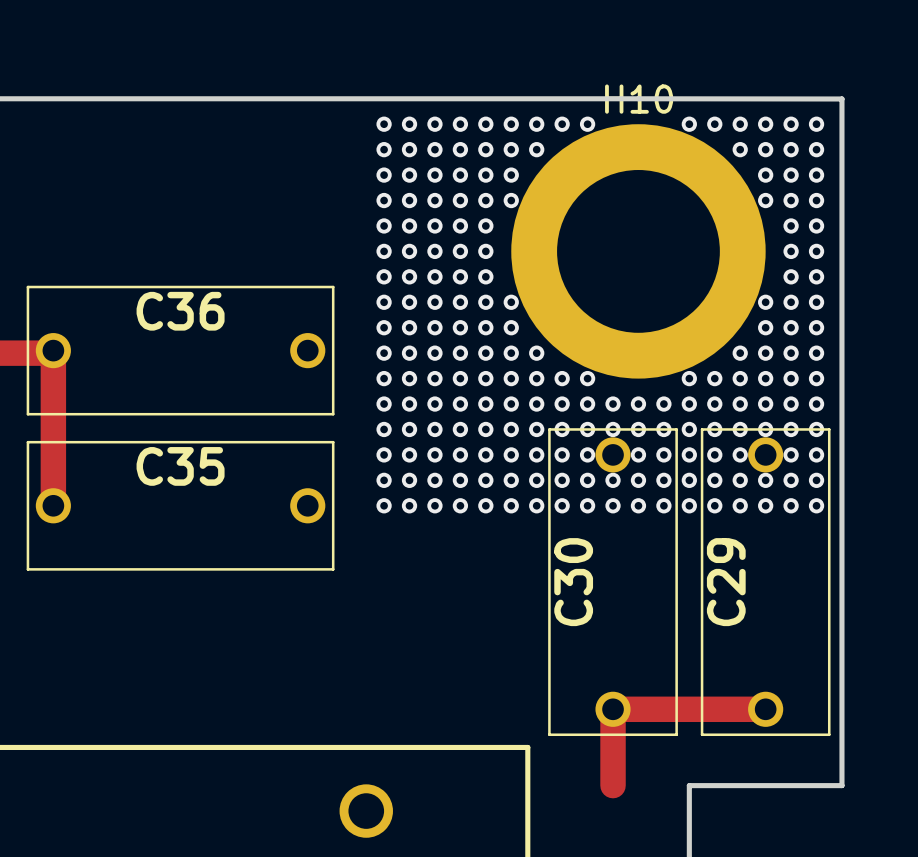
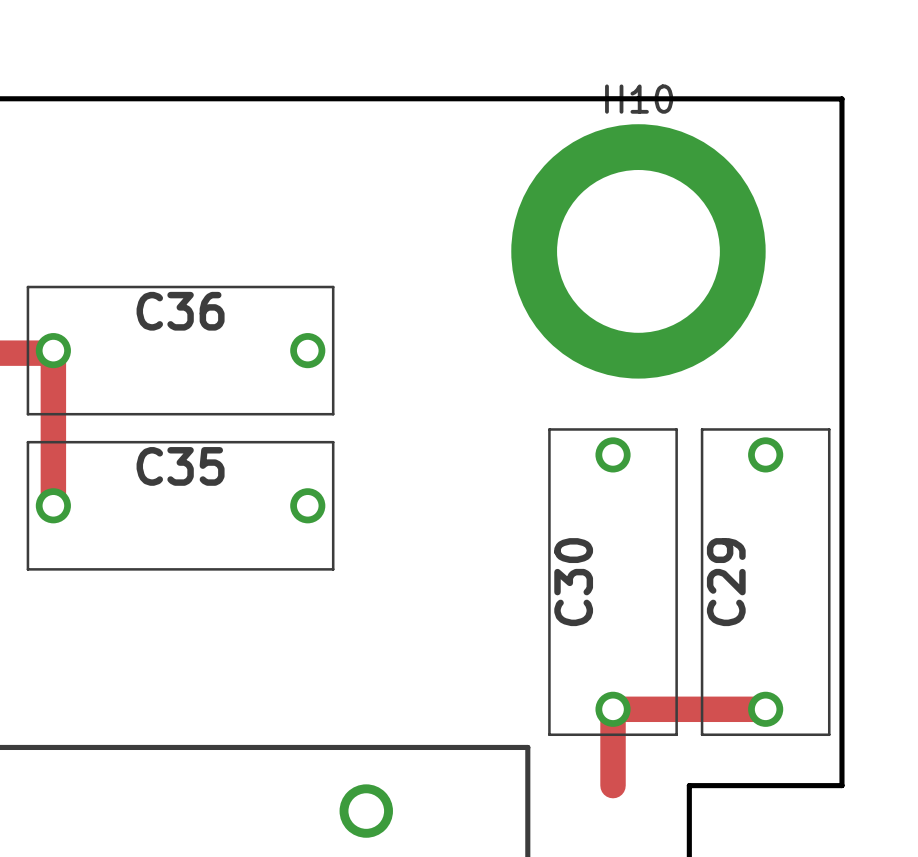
via: (384, 124) -> none
via: (409, 124) -> none
via: (434, 124) -> none
via: (460, 124) -> none
via: (485, 124) -> none
via: (511, 124) -> none
via: (536, 124) -> none
via: (562, 124) -> none
via: (587, 124) -> none
via: (689, 124) -> none
via: (714, 124) -> none
via: (740, 124) -> none
via: (765, 124) -> none
via: (791, 124) -> none
via: (816, 124) -> none
via: (384, 149) -> none
via: (409, 149) -> none
via: (434, 149) -> none
via: (460, 149) -> none
via: (485, 149) -> none
via: (511, 149) -> none
via: (536, 149) -> none
via: (740, 149) -> none
via: (765, 149) -> none
via: (791, 149) -> none
via: (816, 149) -> none
via: (384, 175) -> none
via: (409, 175) -> none
via: (434, 175) -> none
via: (460, 175) -> none
via: (485, 175) -> none
via: (511, 175) -> none
via: (765, 175) -> none
via: (791, 175) -> none
via: (816, 175) -> none
via: (384, 200) -> none
via: (409, 200) -> none
via: (434, 200) -> none
via: (460, 200) -> none
via: (485, 200) -> none
via: (511, 200) -> none
via: (765, 200) -> none
via: (791, 200) -> none
via: (816, 200) -> none
via: (384, 225) -> none
via: (409, 225) -> none
via: (434, 225) -> none
via: (460, 225) -> none
via: (485, 225) -> none
via: (791, 225) -> none
via: (816, 225) -> none
via: (384, 251) -> none
via: (409, 251) -> none
via: (434, 251) -> none
via: (460, 251) -> none
via: (485, 251) -> none
via: (791, 251) -> none
via: (816, 251) -> none
via: (384, 276) -> none
via: (409, 276) -> none
via: (434, 276) -> none
via: (460, 276) -> none
via: (485, 276) -> none
via: (791, 276) -> none
via: (816, 276) -> none
via: (384, 302) -> none
via: (409, 302) -> none
via: (434, 302) -> none
via: (460, 302) -> none
via: (485, 302) -> none
via: (511, 302) -> none
via: (765, 302) -> none
via: (791, 302) -> none
via: (816, 302) -> none
via: (384, 327) -> none
via: (409, 327) -> none
via: (434, 327) -> none
via: (460, 327) -> none
via: (485, 327) -> none
via: (511, 327) -> none
via: (765, 327) -> none
via: (791, 327) -> none
via: (816, 327) -> none
via: (384, 353) -> none
via: (409, 353) -> none
via: (434, 353) -> none
via: (460, 353) -> none
via: (485, 353) -> none
via: (511, 353) -> none
via: (536, 353) -> none
via: (740, 353) -> none
via: (765, 353) -> none
via: (791, 353) -> none
via: (816, 353) -> none
via: (384, 378) -> none
via: (409, 378) -> none
via: (434, 378) -> none
via: (460, 378) -> none
via: (485, 378) -> none
via: (511, 378) -> none
via: (536, 378) -> none
via: (562, 378) -> none
via: (587, 378) -> none
via: (689, 378) -> none
via: (714, 378) -> none
via: (740, 378) -> none
via: (765, 378) -> none
via: (791, 378) -> none
via: (816, 378) -> none
via: (384, 404) -> none
via: (409, 404) -> none
via: (434, 404) -> none
via: (460, 404) -> none
via: (485, 404) -> none
via: (511, 404) -> none
via: (536, 404) -> none
via: (562, 404) -> none
via: (587, 404) -> none
via: (613, 404) -> none
via: (638, 404) -> none
via: (663, 404) -> none
via: (689, 404) -> none
via: (714, 404) -> none
via: (740, 404) -> none
via: (765, 404) -> none
via: (791, 404) -> none
via: (816, 404) -> none
via: (384, 429) -> none
via: (409, 429) -> none
via: (434, 429) -> none
via: (460, 429) -> none
via: (485, 429) -> none
via: (511, 429) -> none
via: (536, 429) -> none
via: (562, 429) -> none
via: (587, 429) -> none
via: (613, 429) -> none
via: (638, 429) -> none
via: (663, 429) -> none
via: (689, 429) -> none
via: (714, 429) -> none
via: (740, 429) -> none
via: (765, 429) -> none
via: (791, 429) -> none
via: (816, 429) -> none
via: (384, 454) -> none
via: (409, 454) -> none
via: (434, 454) -> none
via: (460, 454) -> none
via: (485, 454) -> none
via: (511, 454) -> none
via: (536, 454) -> none
via: (562, 454) -> none
via: (587, 454) -> none
via: (638, 454) -> none
via: (663, 454) -> none
via: (689, 454) -> none
via: (714, 454) -> none
via: (740, 454) -> none
via: (791, 454) -> none
via: (816, 454) -> none
via: (384, 480) -> none
via: (409, 480) -> none
via: (434, 480) -> none
via: (460, 480) -> none
via: (485, 480) -> none
via: (511, 480) -> none
via: (536, 480) -> none
via: (562, 480) -> none
via: (587, 480) -> none
via: (613, 480) -> none
via: (638, 480) -> none
via: (663, 480) -> none
via: (689, 480) -> none
via: (714, 480) -> none
via: (740, 480) -> none
via: (765, 480) -> none
via: (791, 480) -> none
via: (816, 480) -> none
via: (384, 505) -> none
via: (409, 505) -> none
via: (434, 505) -> none
via: (460, 505) -> none
via: (485, 505) -> none
via: (511, 505) -> none
via: (536, 505) -> none
via: (562, 505) -> none
via: (587, 505) -> none
via: (613, 505) -> none
via: (638, 505) -> none
via: (663, 505) -> none
via: (689, 505) -> none
via: (714, 505) -> none
via: (740, 505) -> none
via: (765, 505) -> none
via: (791, 505) -> none
via: (816, 505) -> none

